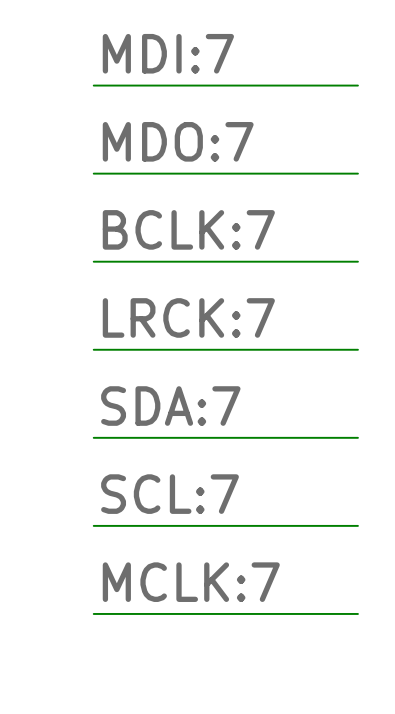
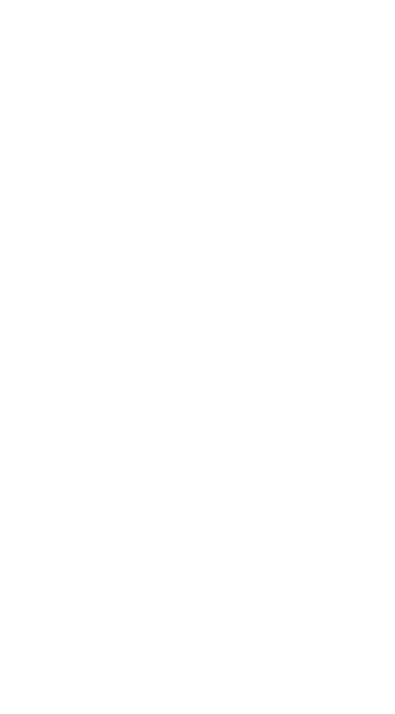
label: MDI:7 (168, 53) -> none
wire: (93, 85) (357, 85) -> none
label: MDO:7 (178, 141) -> none
wire: (93, 173) (357, 173) -> none
label: BCLK:7 (188, 229) -> none
wire: (93, 261) (357, 261) -> none
label: LRCK:7 (188, 317) -> none
wire: (93, 349) (357, 349) -> none
label: SDA:7 (170, 406) -> none
wire: (93, 437) (357, 437) -> none
label: SCL:7 (170, 494) -> none
wire: (93, 525) (357, 525) -> none
label: MCLK:7 (191, 582) -> none
wire: (93, 613) (357, 613) -> none

